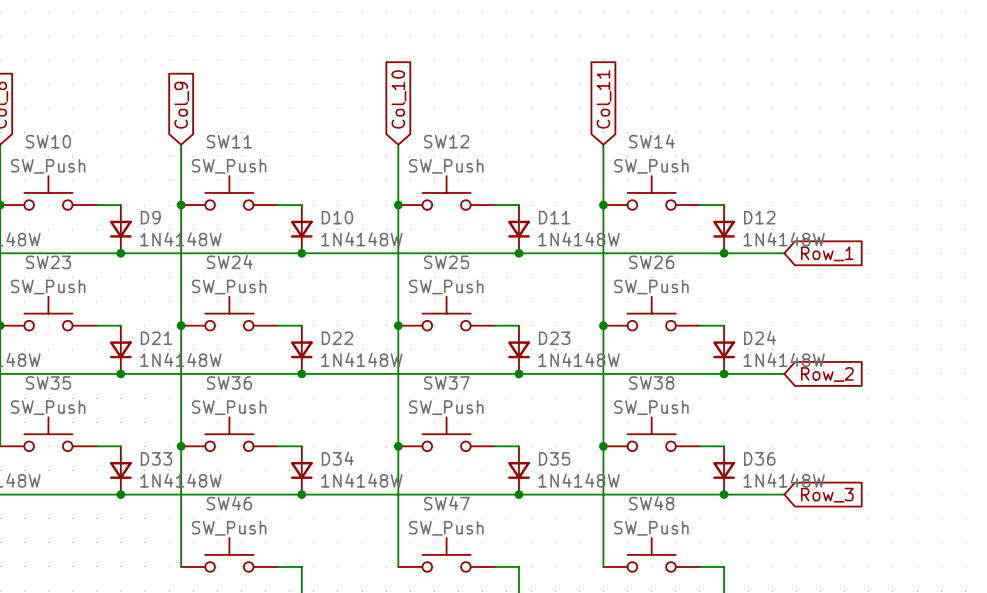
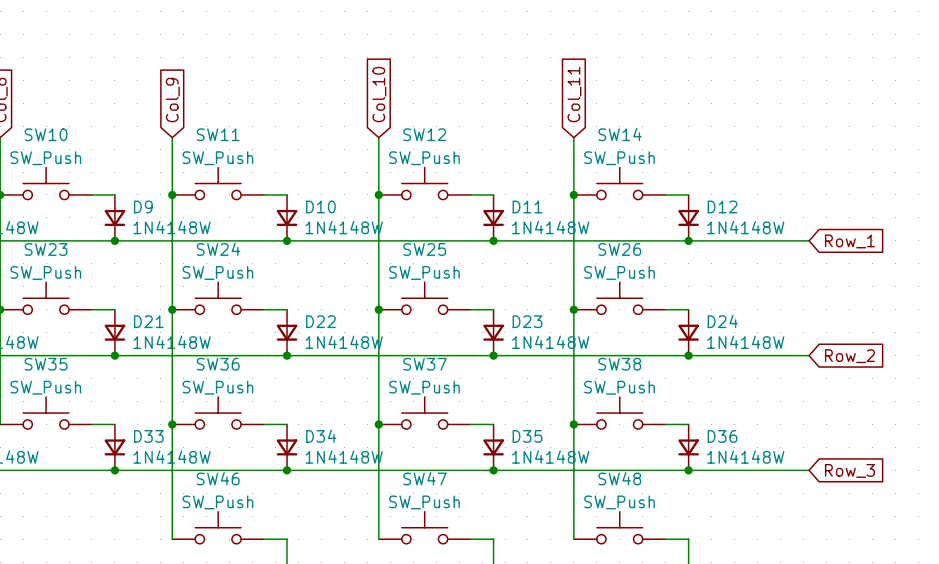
wire: none -> (745, 240) (809, 240)
global label position: Row_1 (827, 253) -> Row_1 (849, 241)
wire: none -> (745, 355) (809, 355)
global label position: Row_2 (827, 374) -> Row_2 (849, 356)
wire: none -> (745, 470) (809, 470)
global label position: Row_3 (827, 495) -> Row_3 (849, 470)

